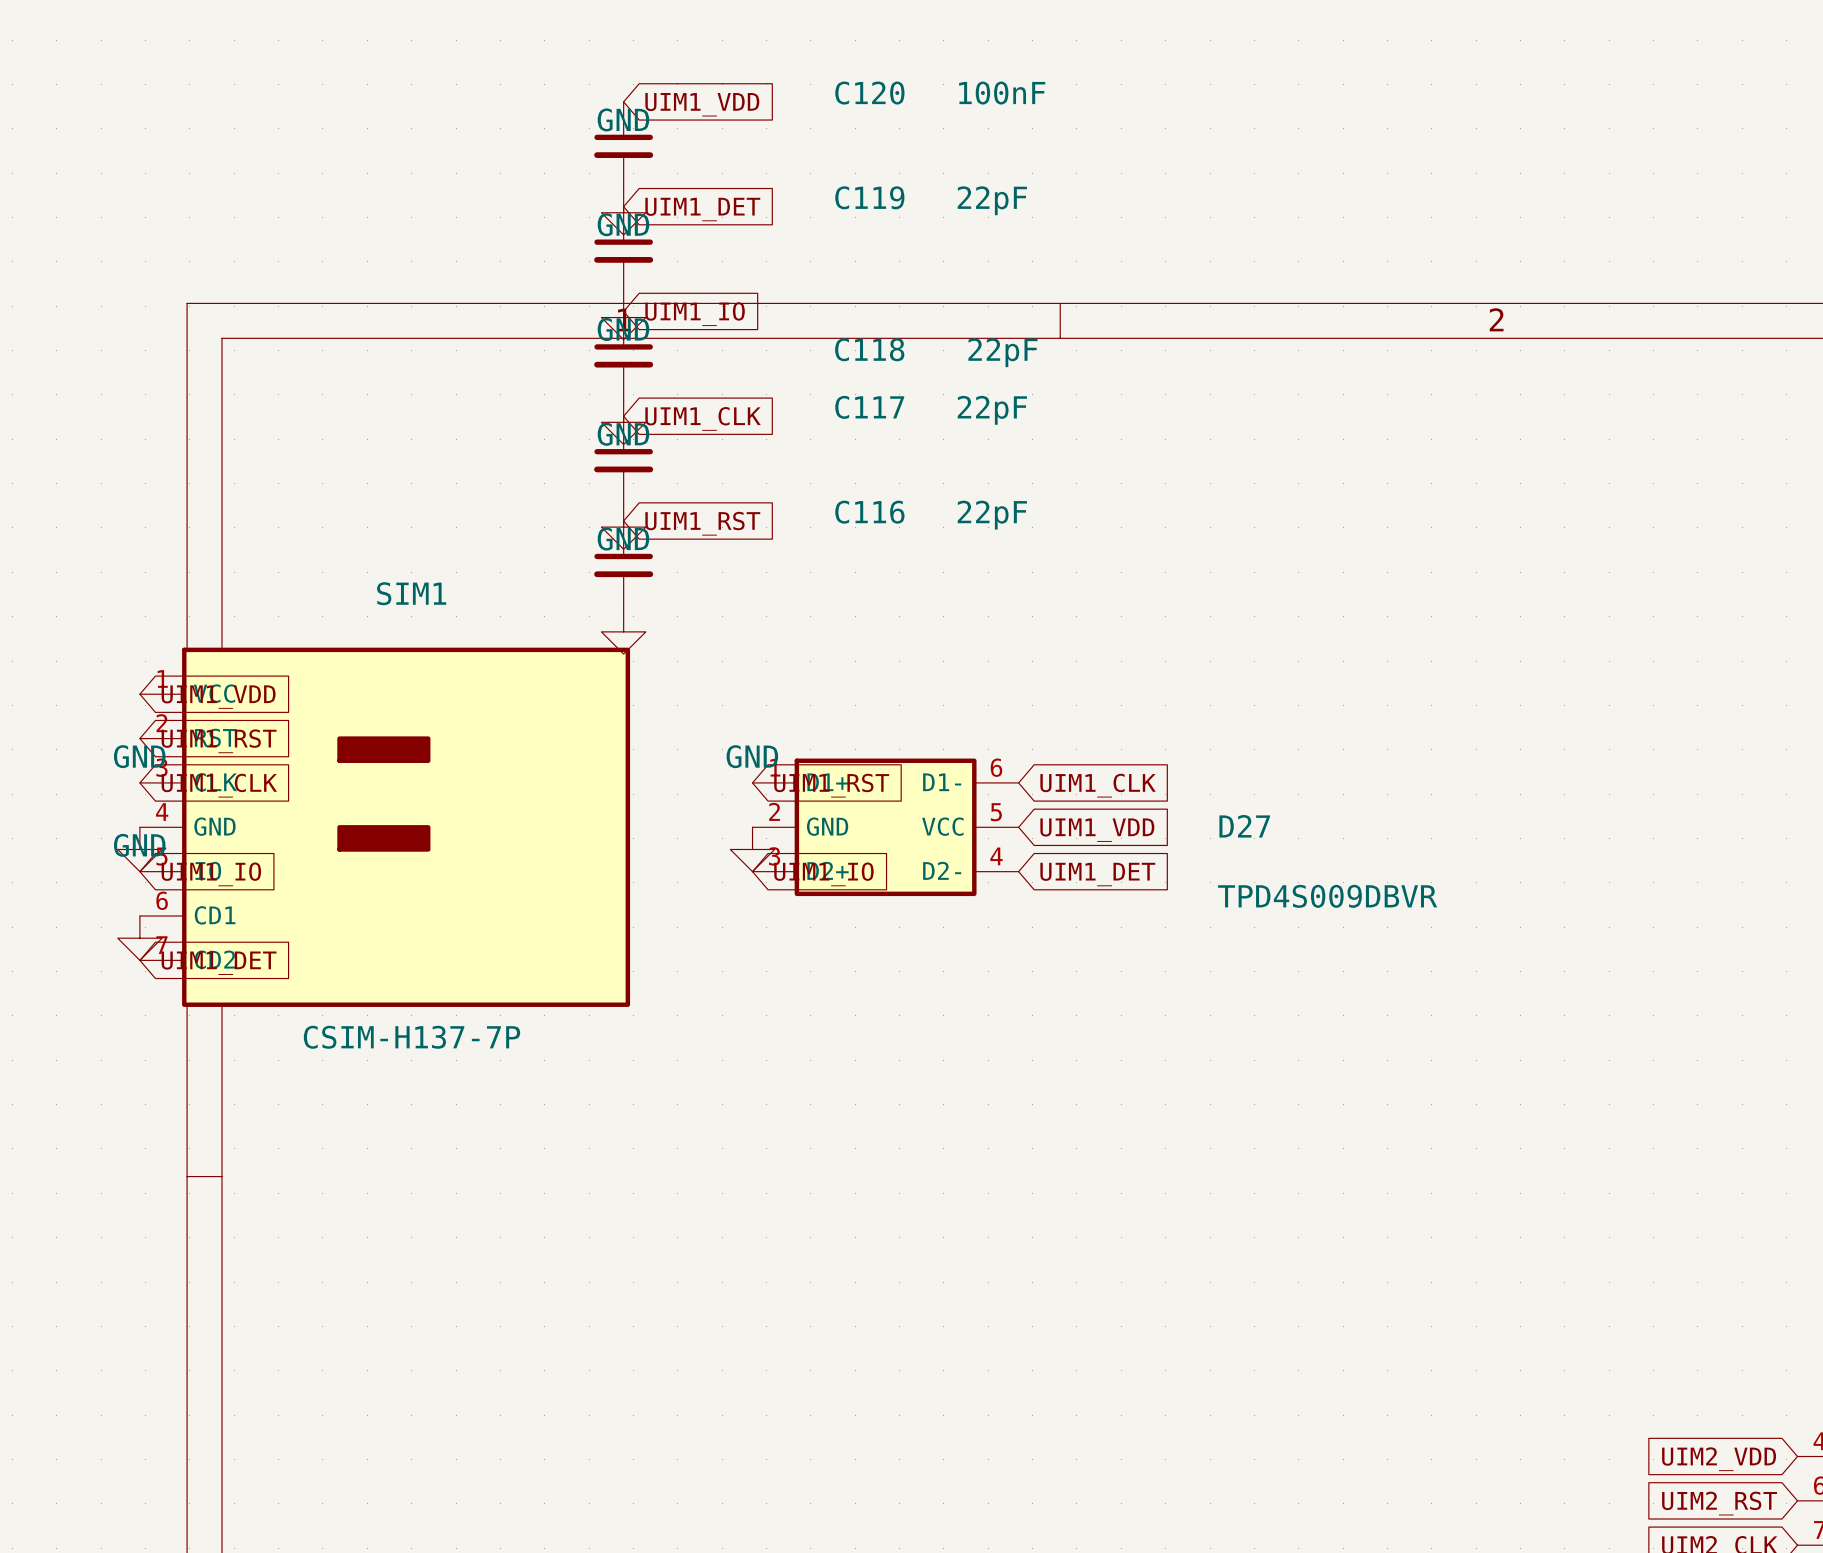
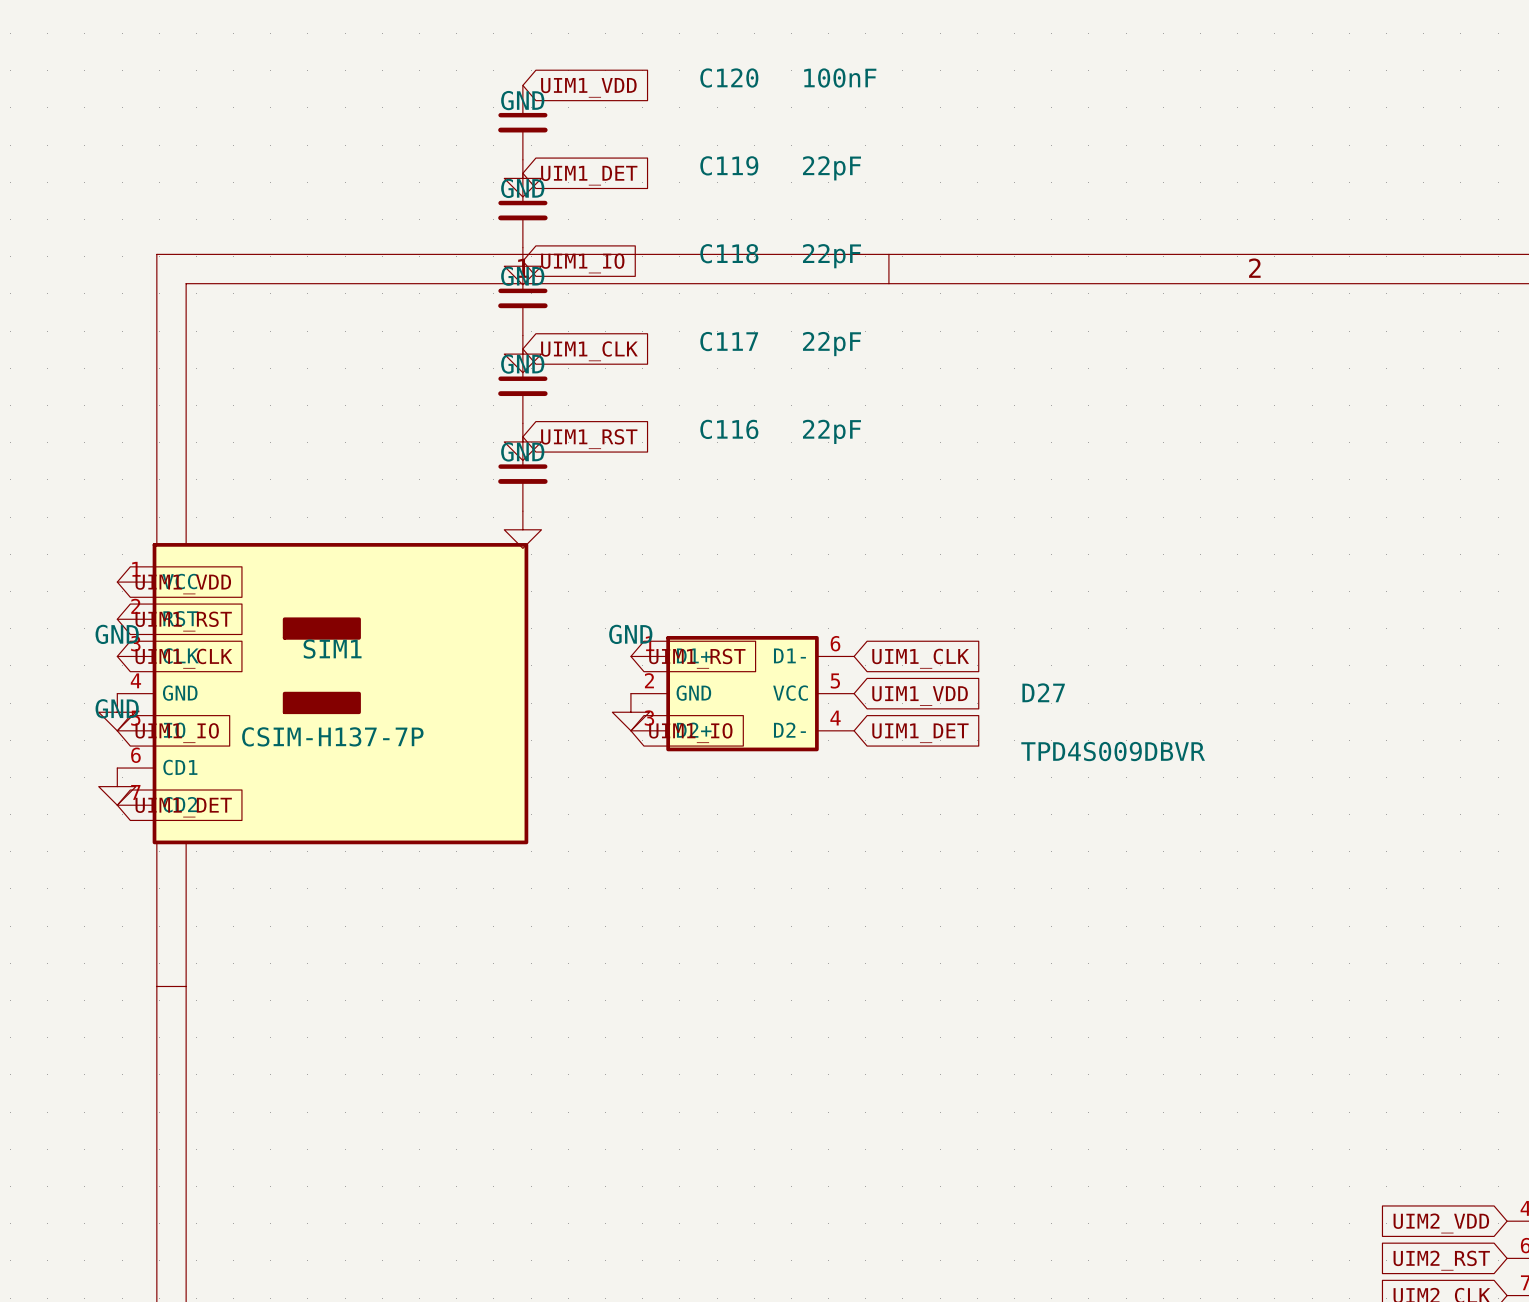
C118 name position: C118 (869, 349) -> C118 (729, 253)
C118 value position: 22pF (1002, 352) -> 22pF (831, 256)
SIM1 name position: SIM1 (411, 593) -> SIM1 (332, 649)
SIM1 value position: CSIM-H137-7P (411, 1037) -> CSIM-H137-7P (332, 736)

